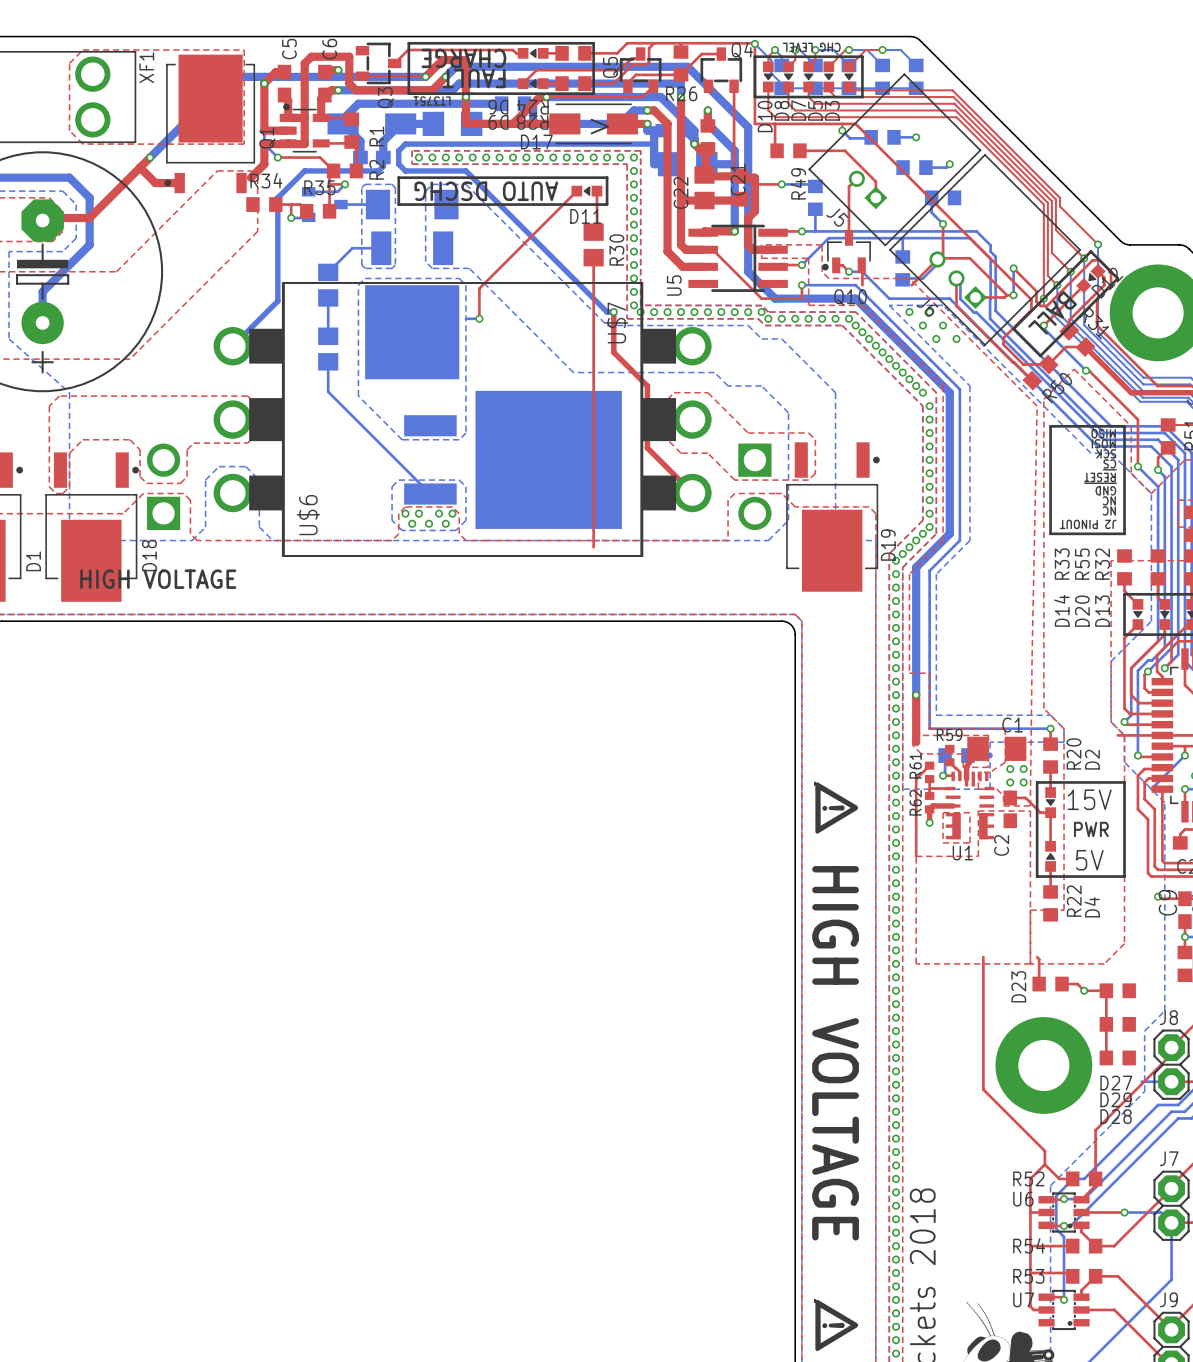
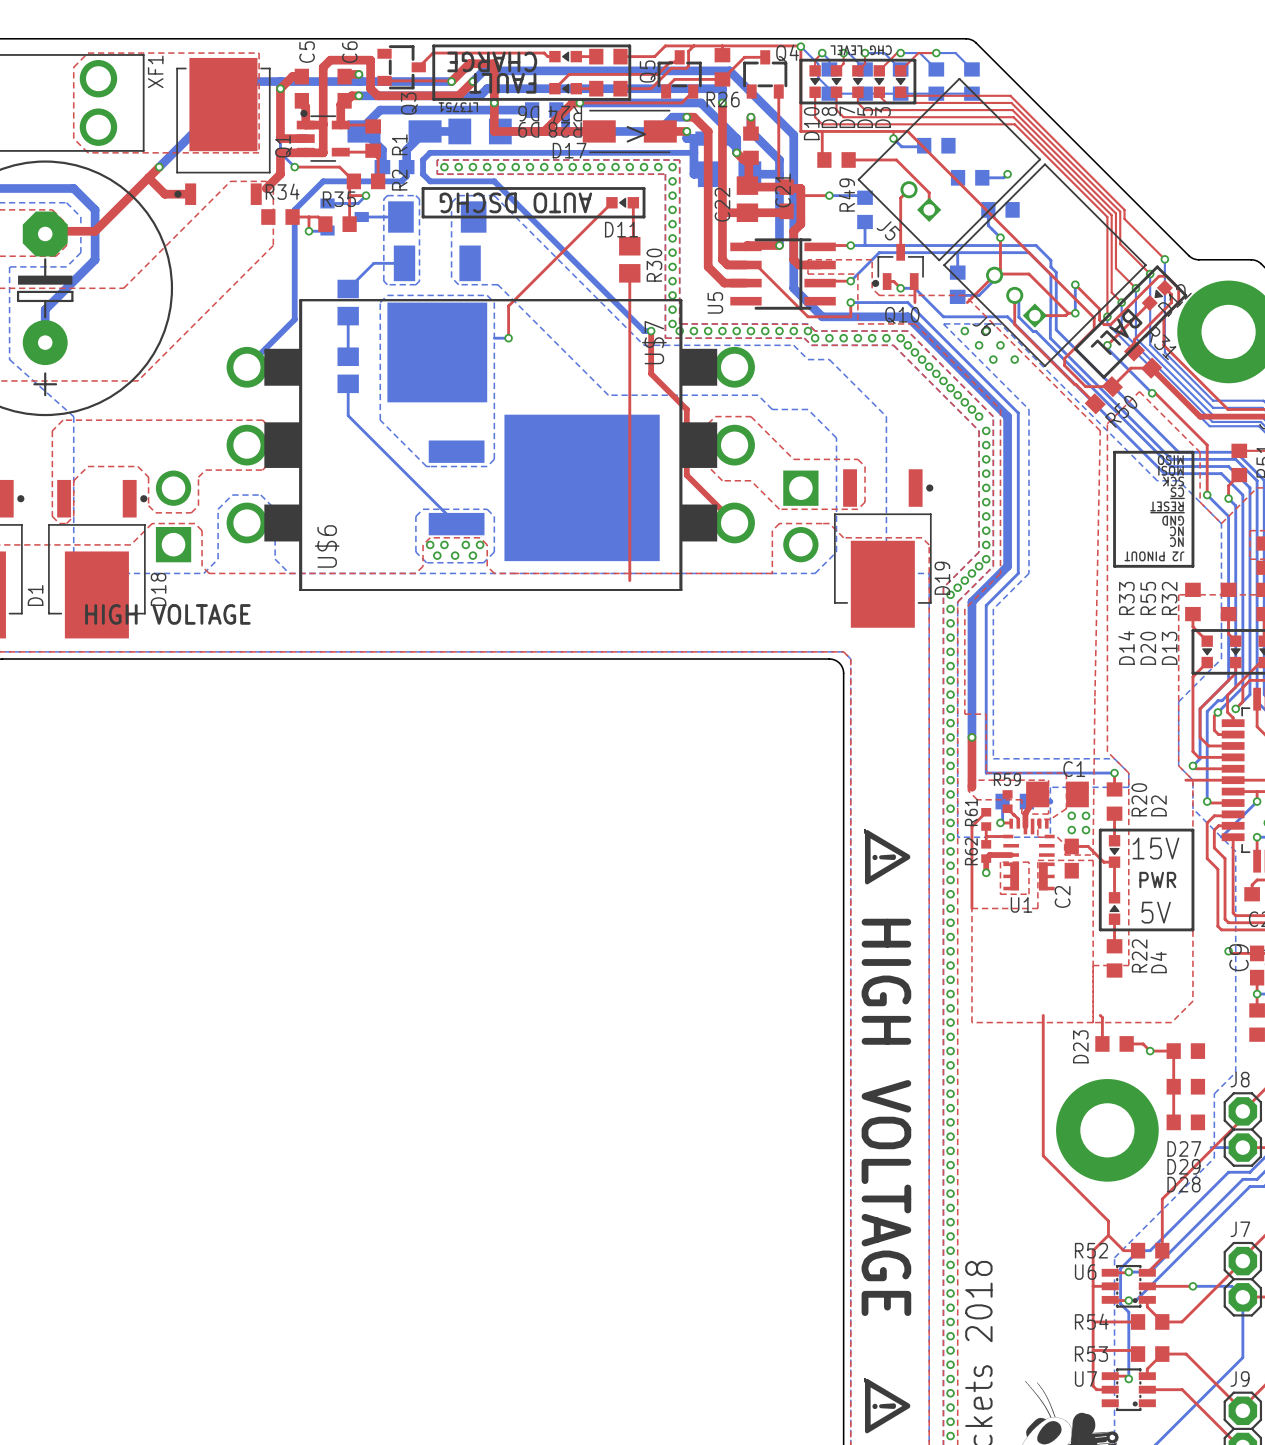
bottom track: (894, 137) (916, 137) -> none
via: (916, 137) -> none

